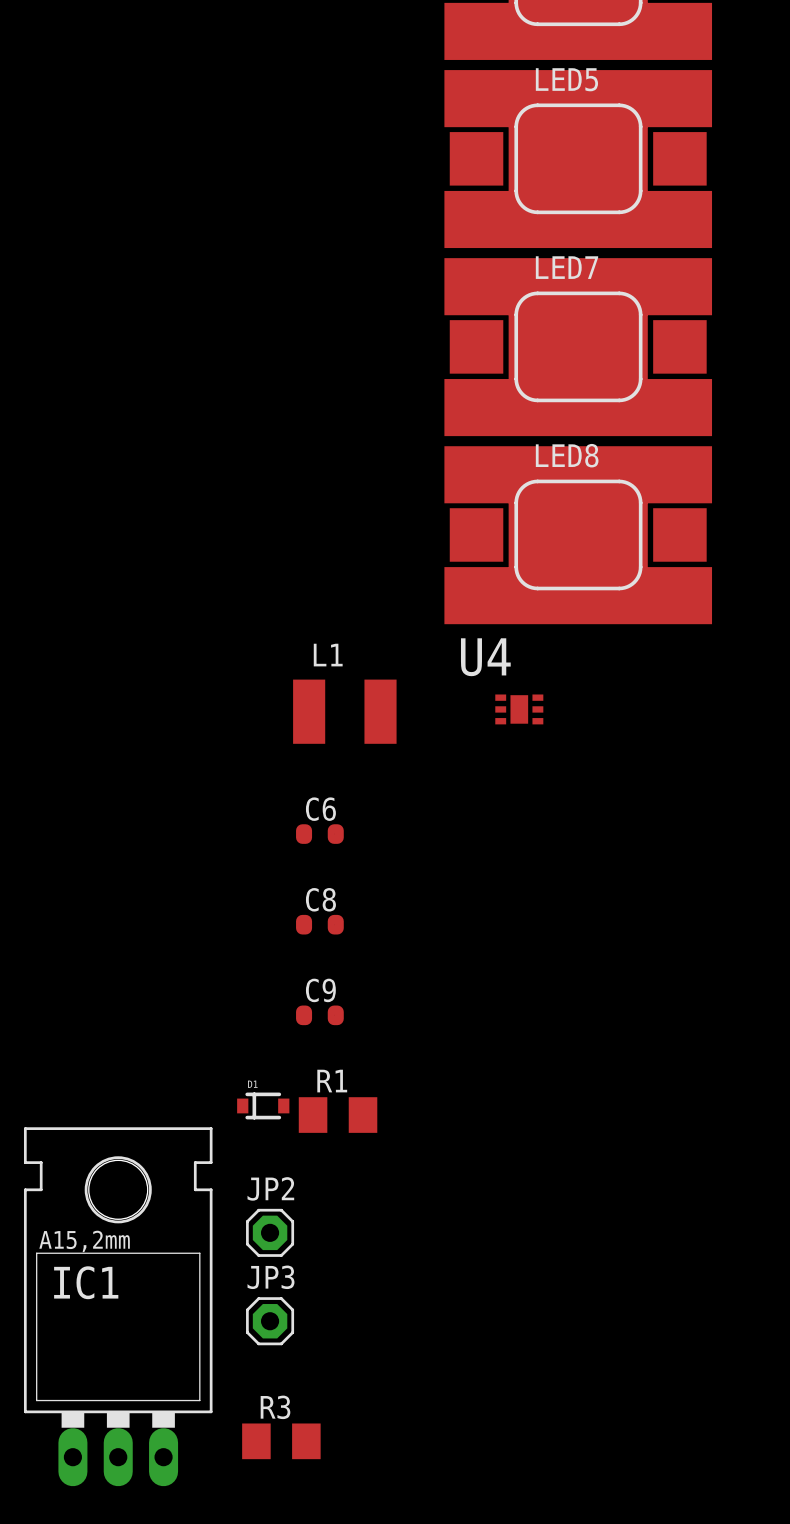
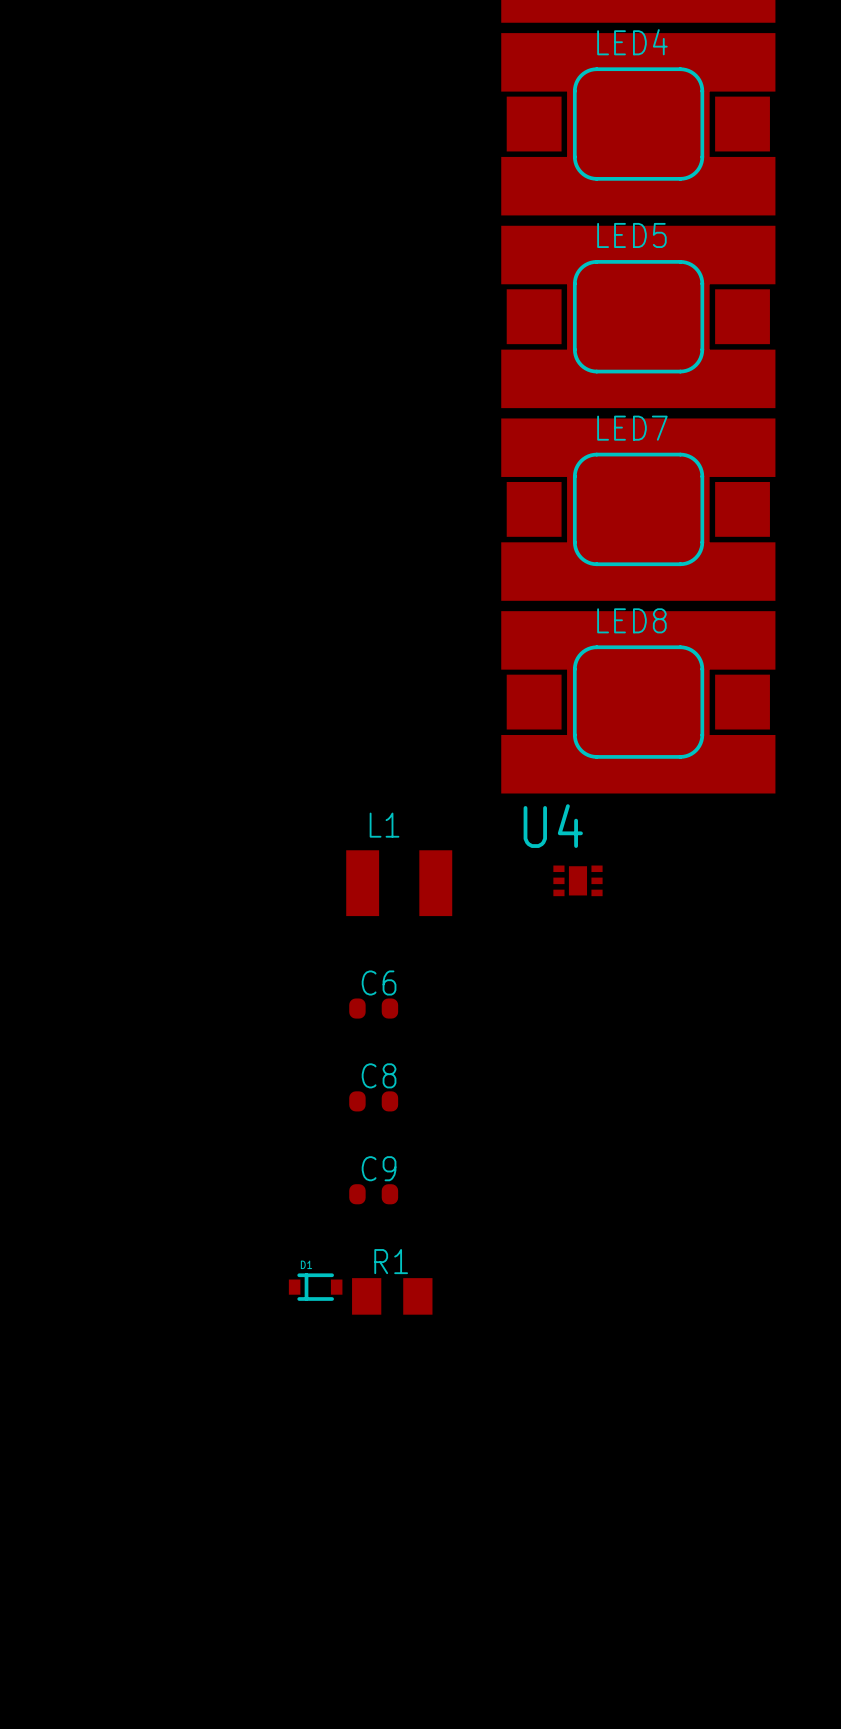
JP2: (270, 1232) -> none
IC1: (118, 1306) -> none
JP3: (270, 1321) -> none
R3: (281, 1441) -> none

